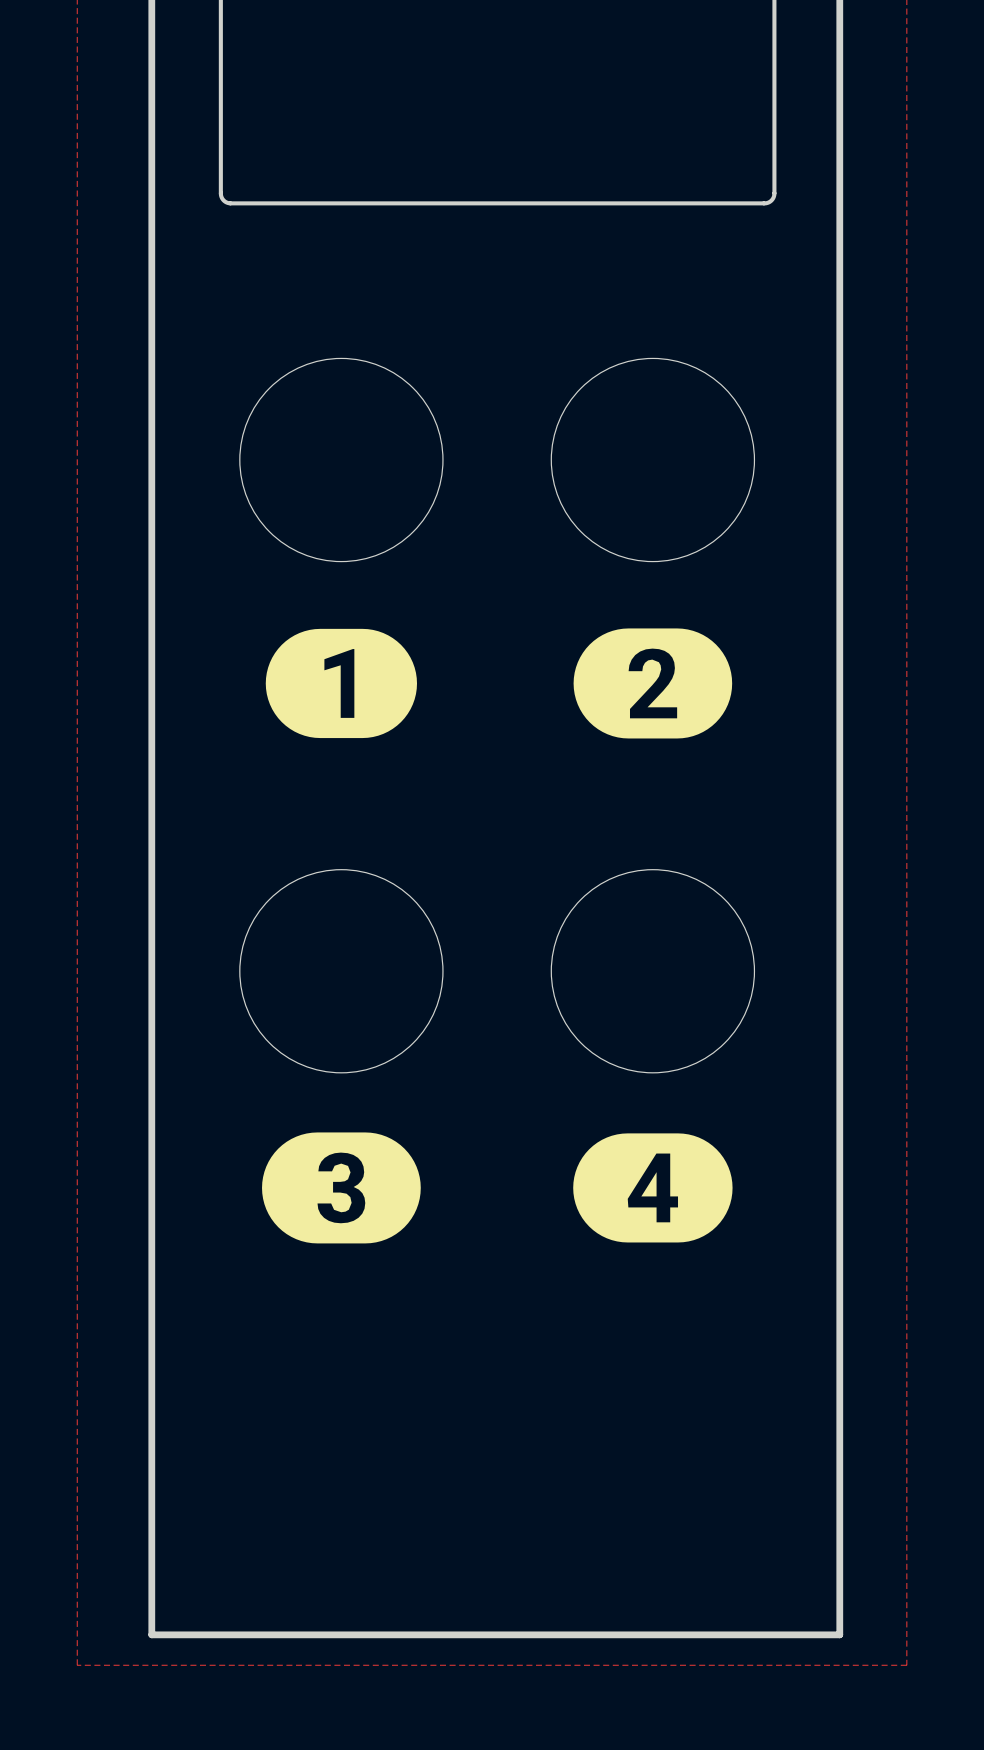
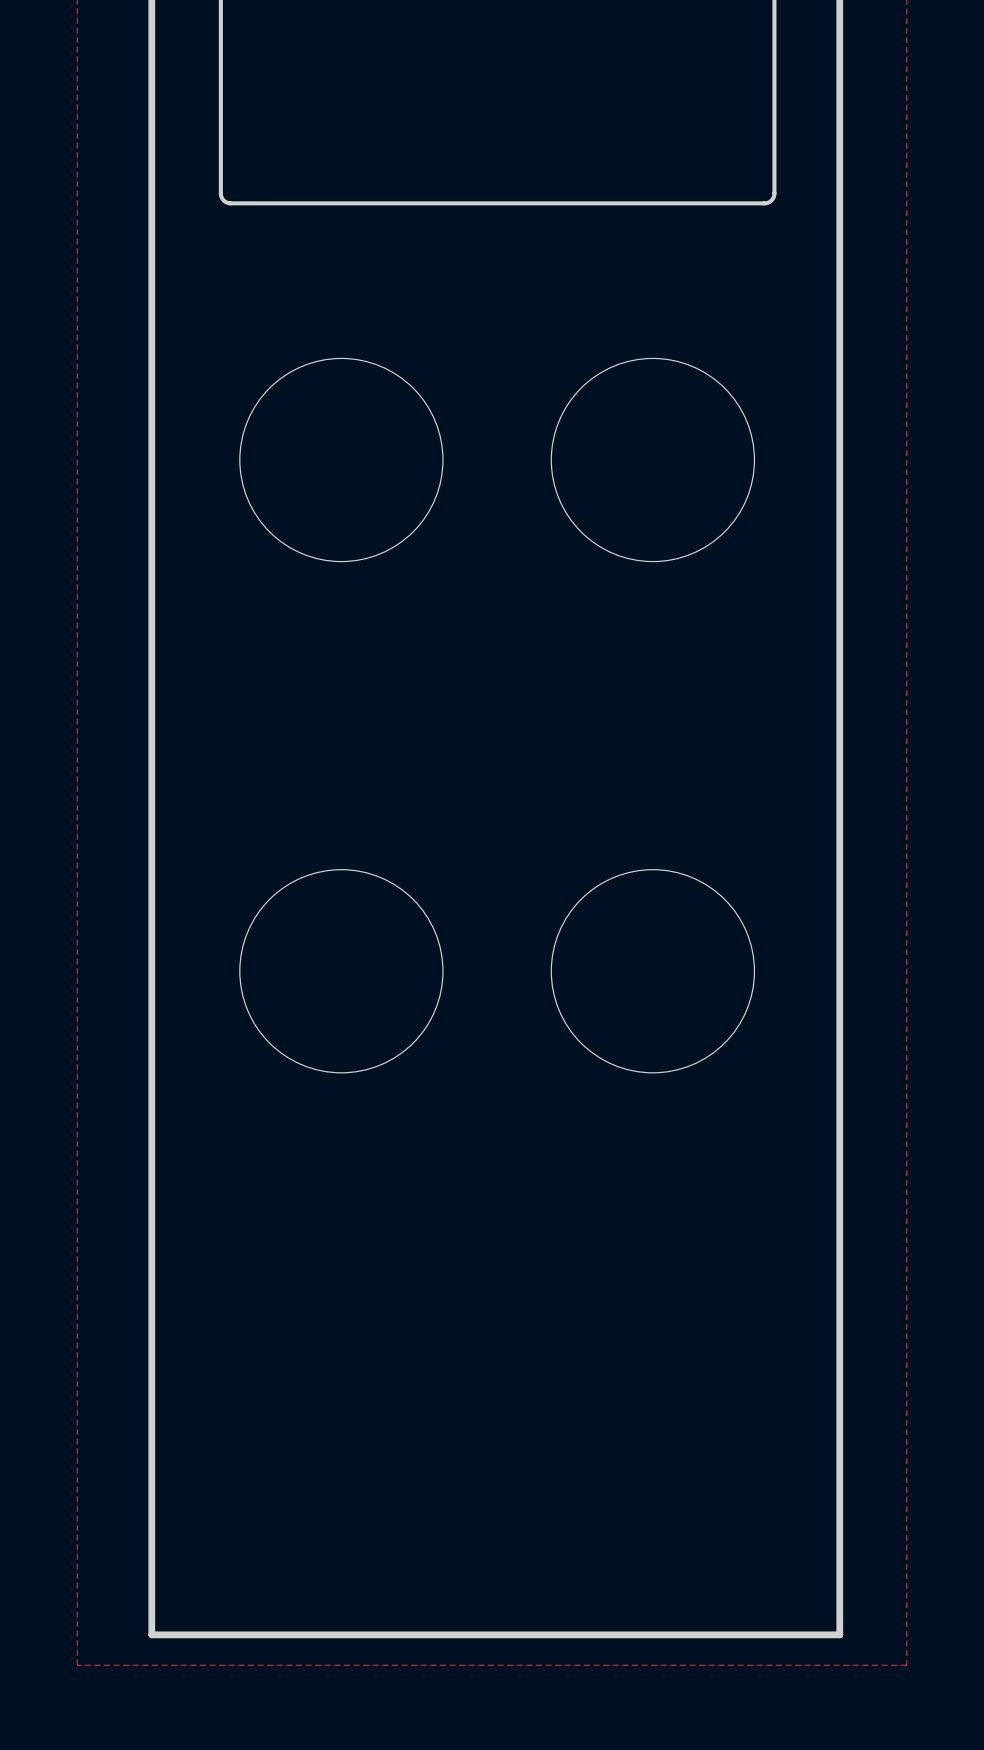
drawing: [265, 628, 418, 739] -> none
drawing: [573, 628, 733, 739] -> none
drawing: [262, 1132, 421, 1244] -> none
drawing: [573, 1133, 733, 1243] -> none

